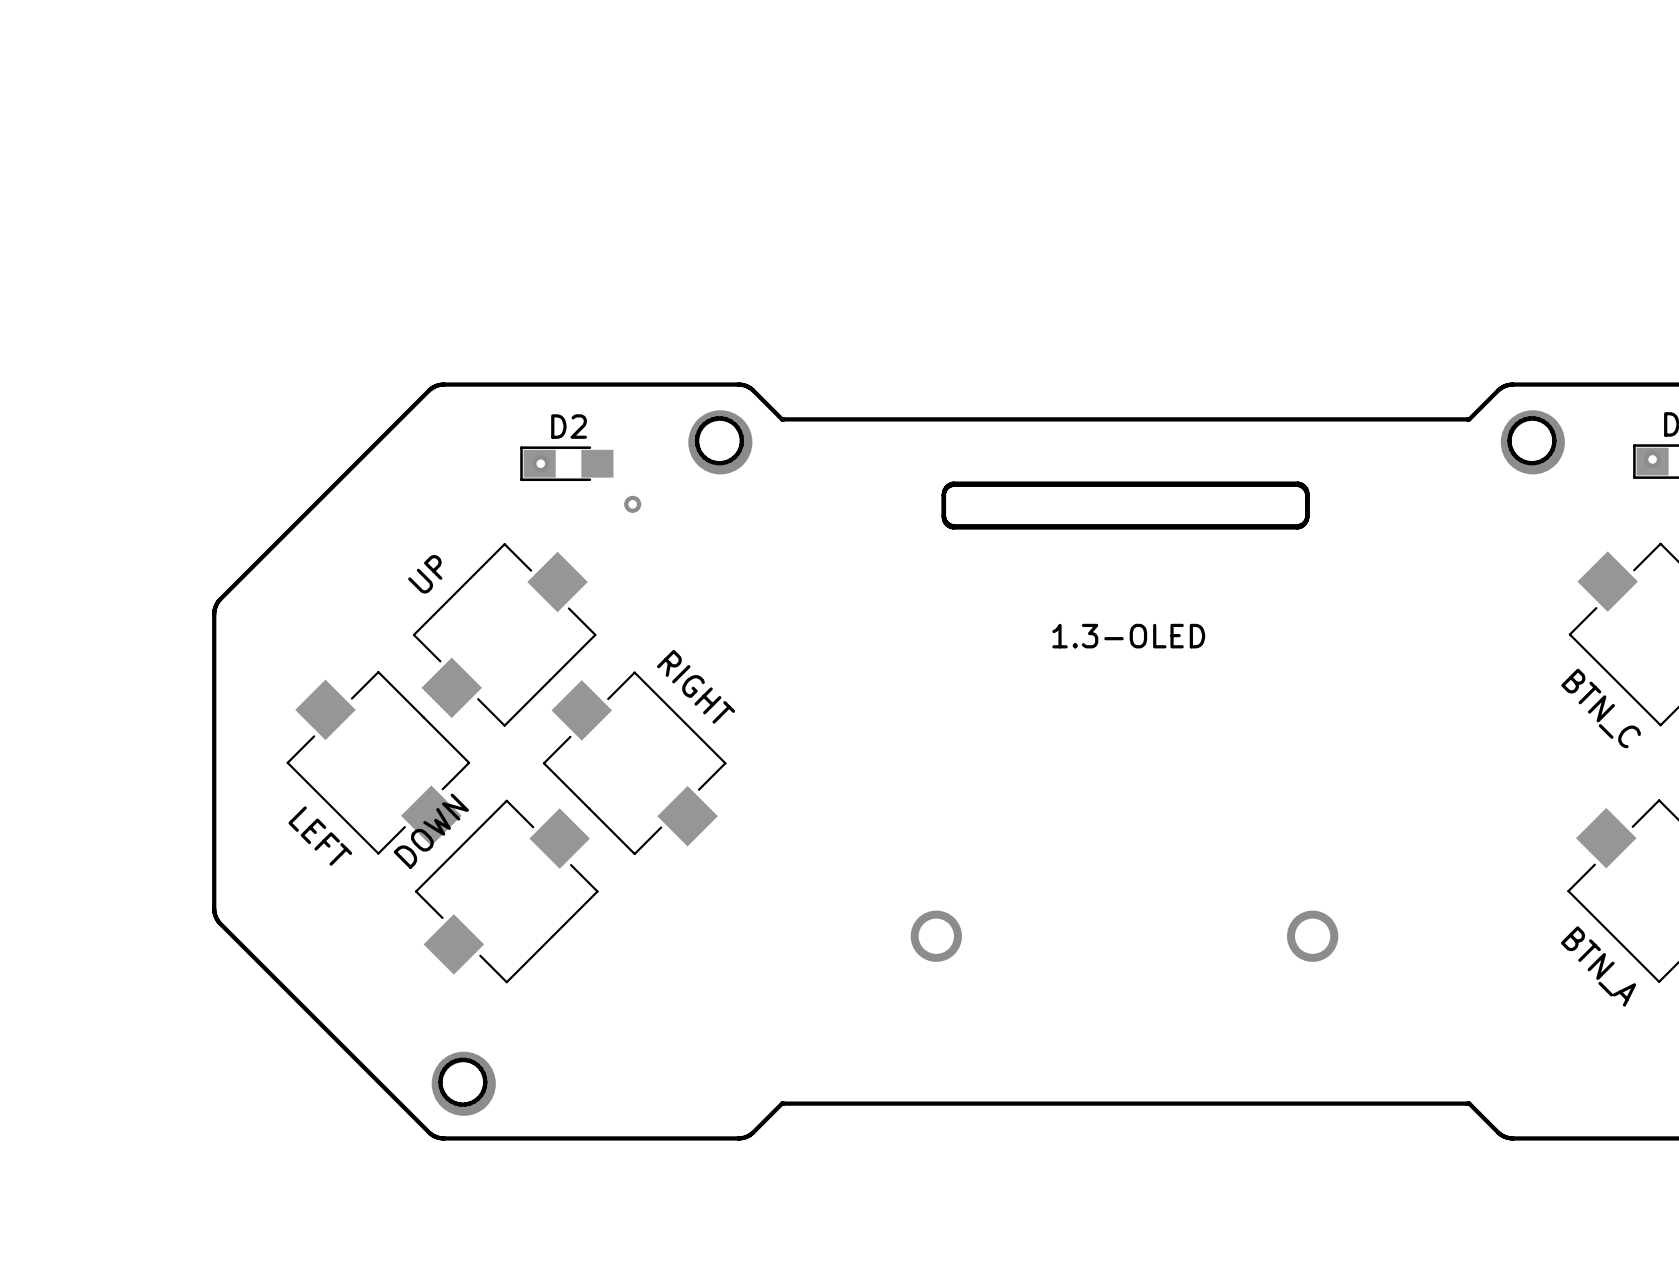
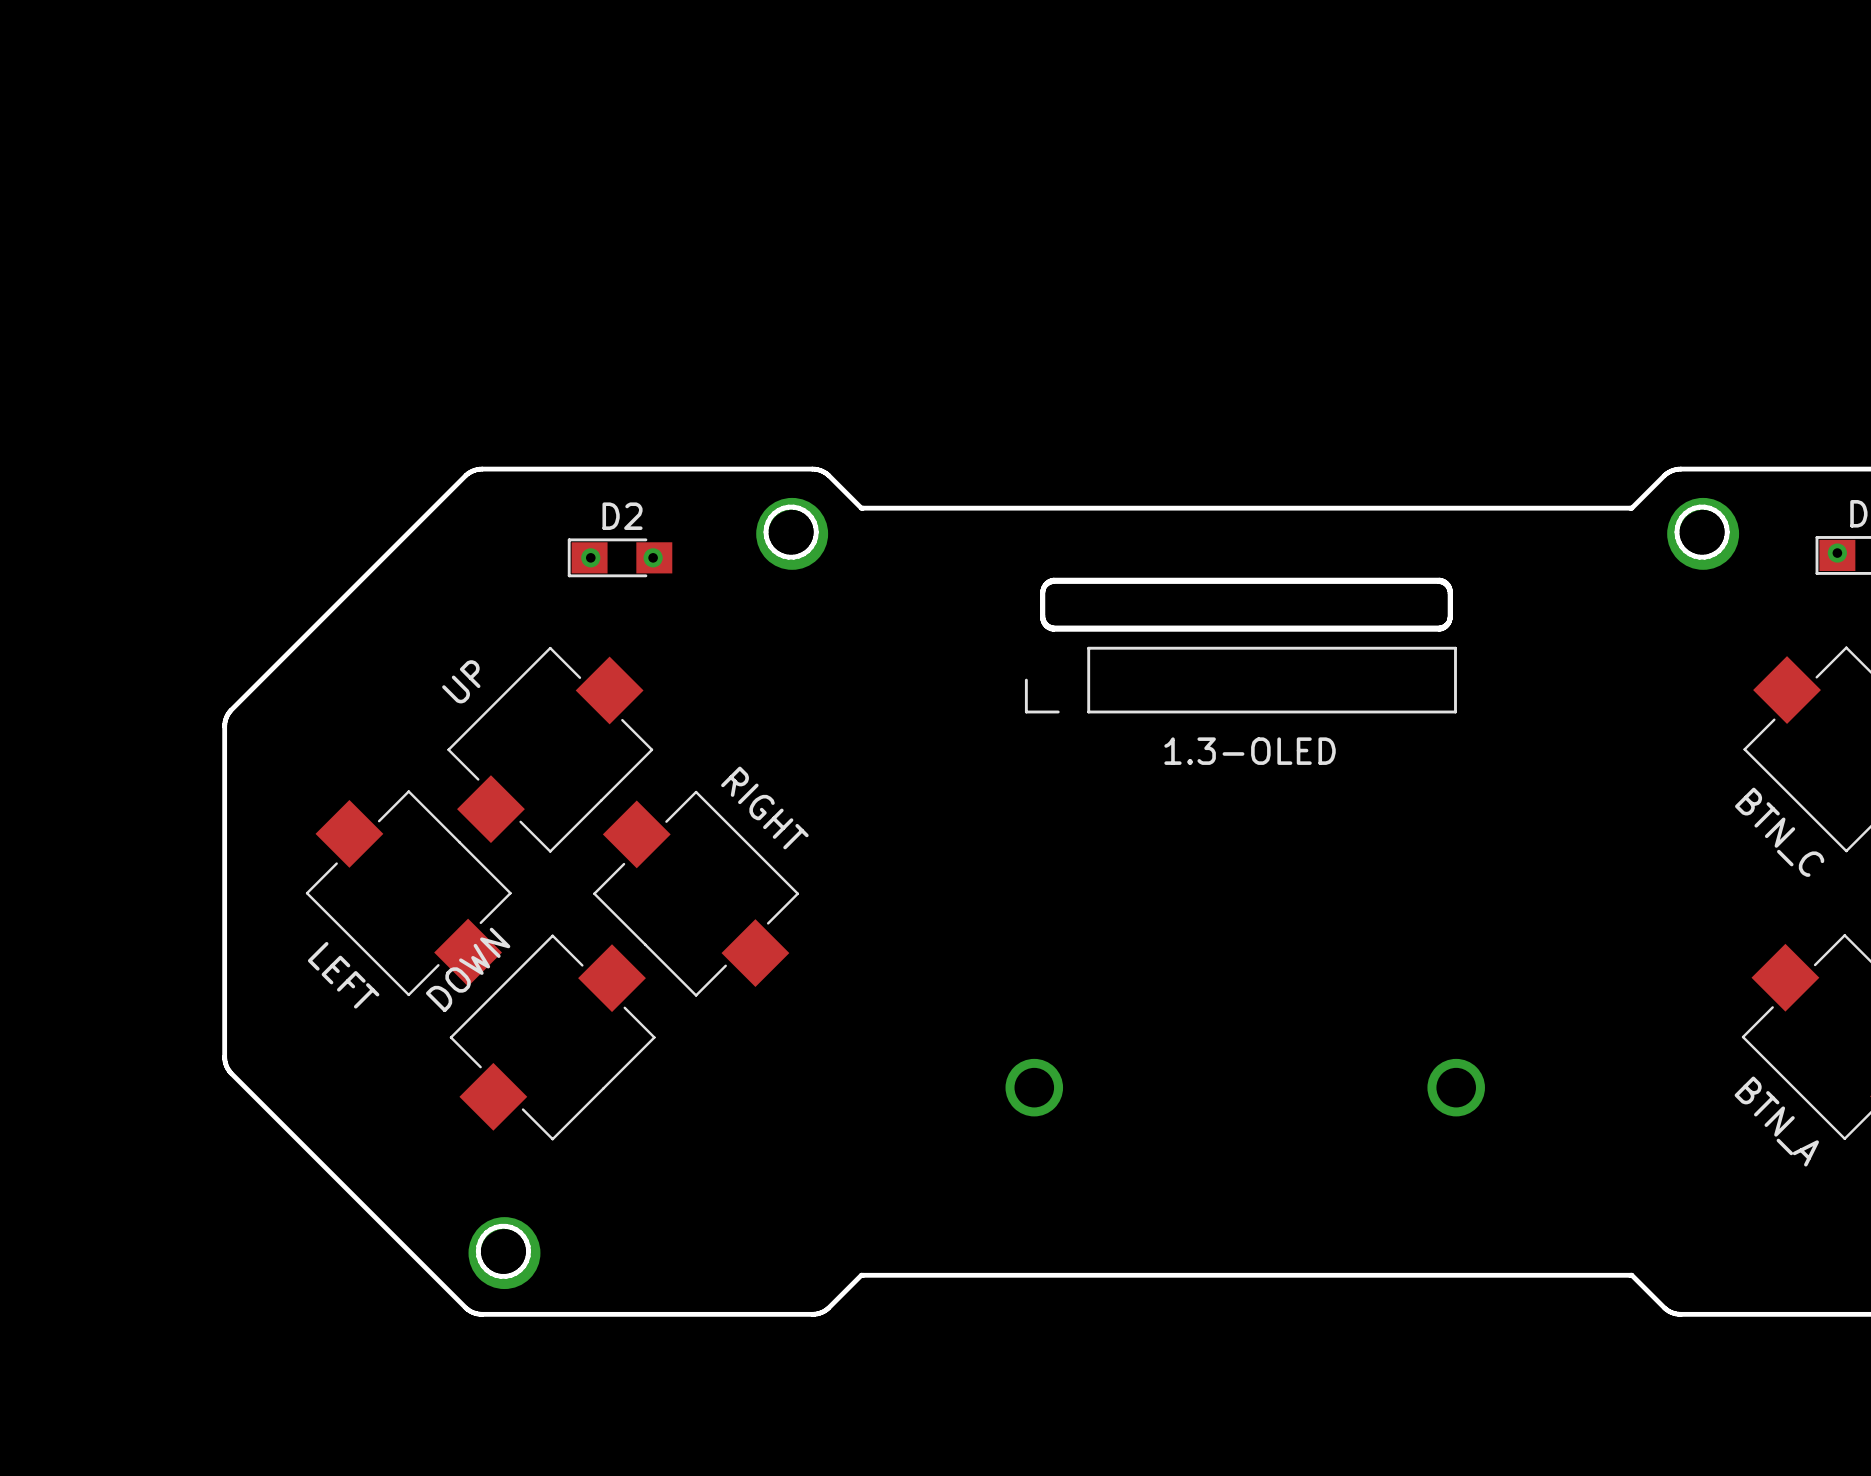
via position: (632, 504) -> (653, 557)
part: none -> 1.3-OLED (1240, 646)

